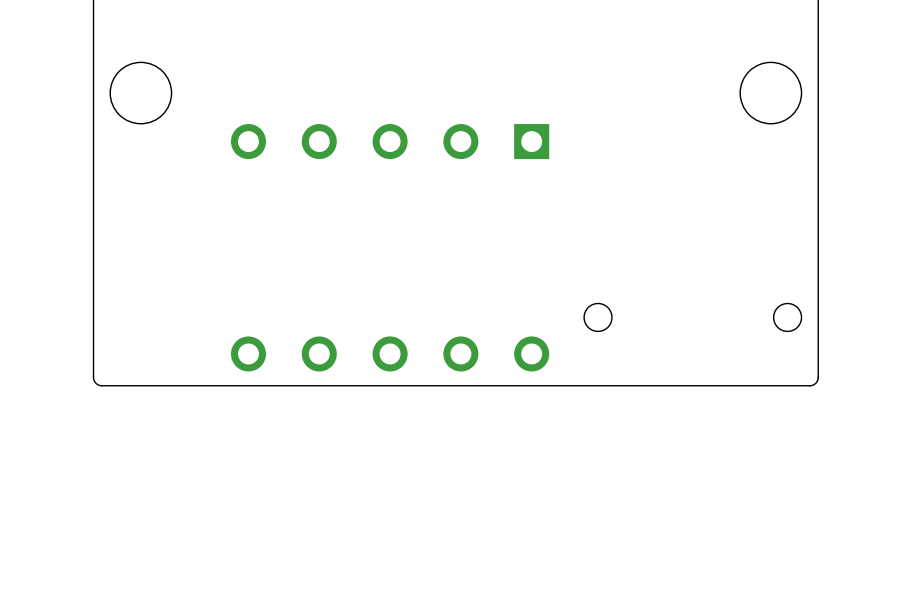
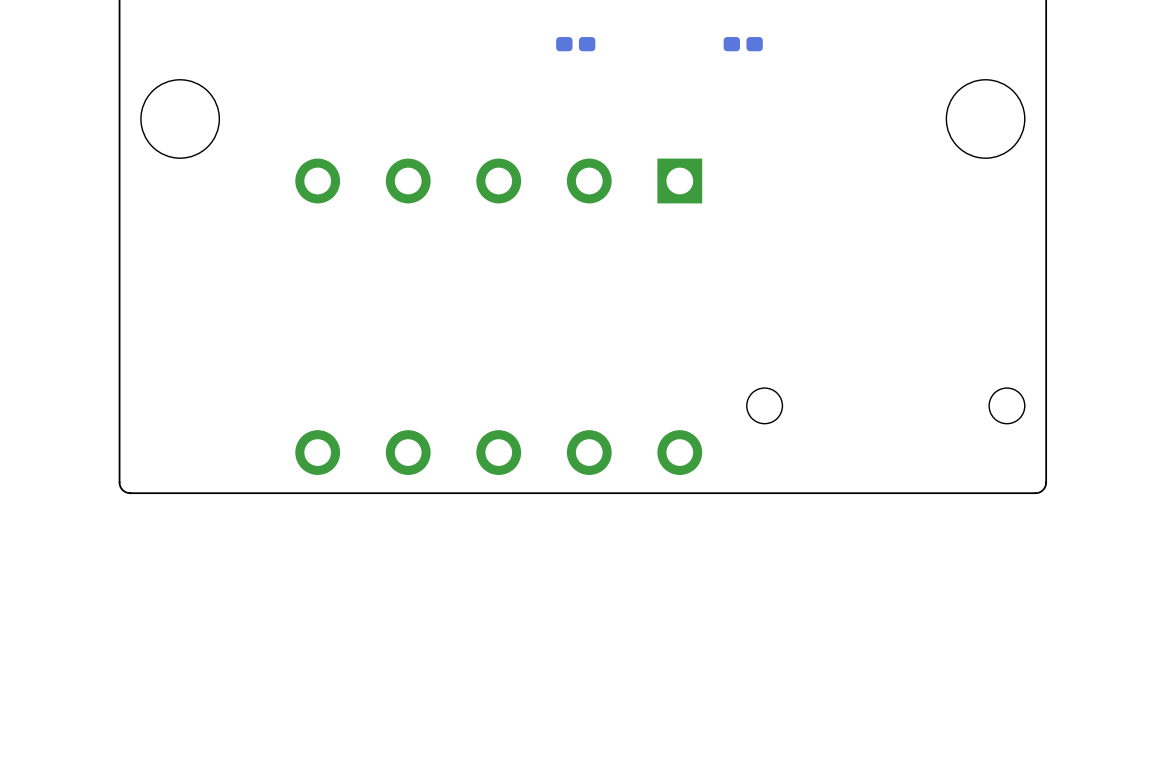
part: none -> (575, 44)
part: none -> (743, 44)

